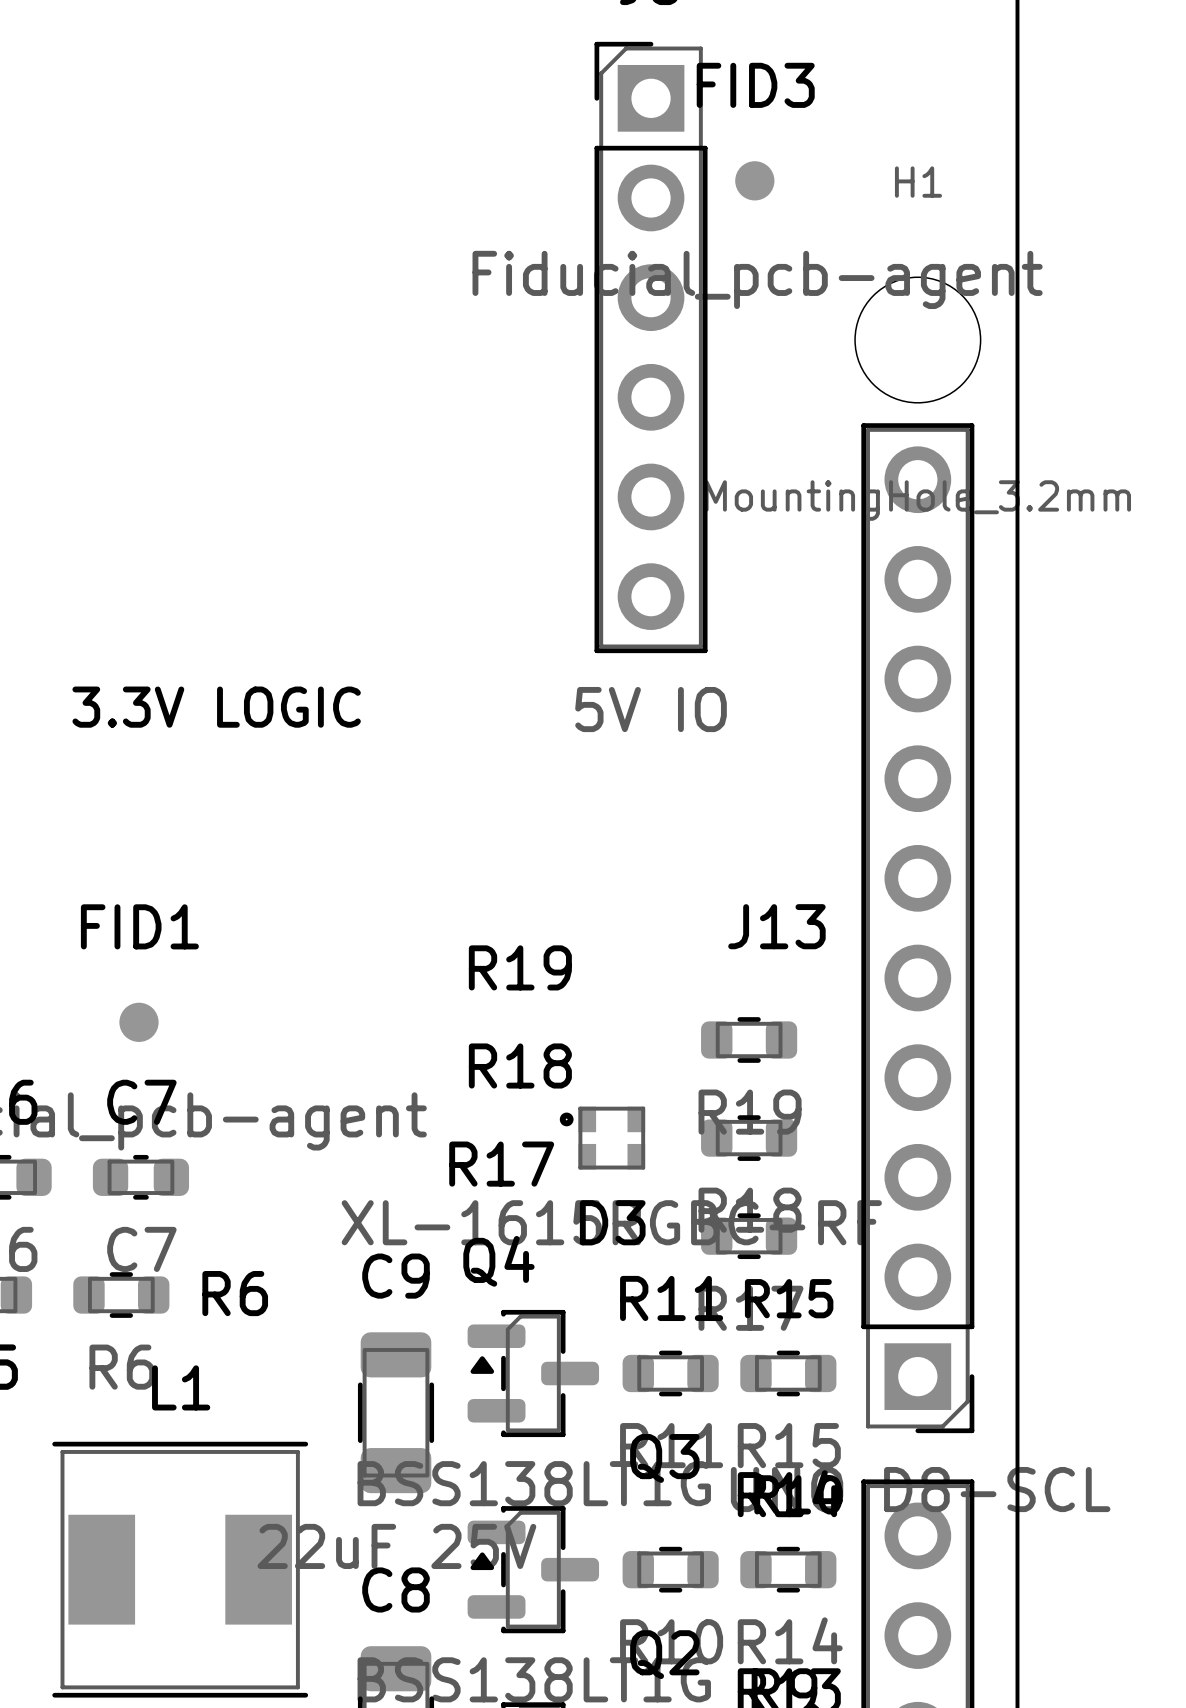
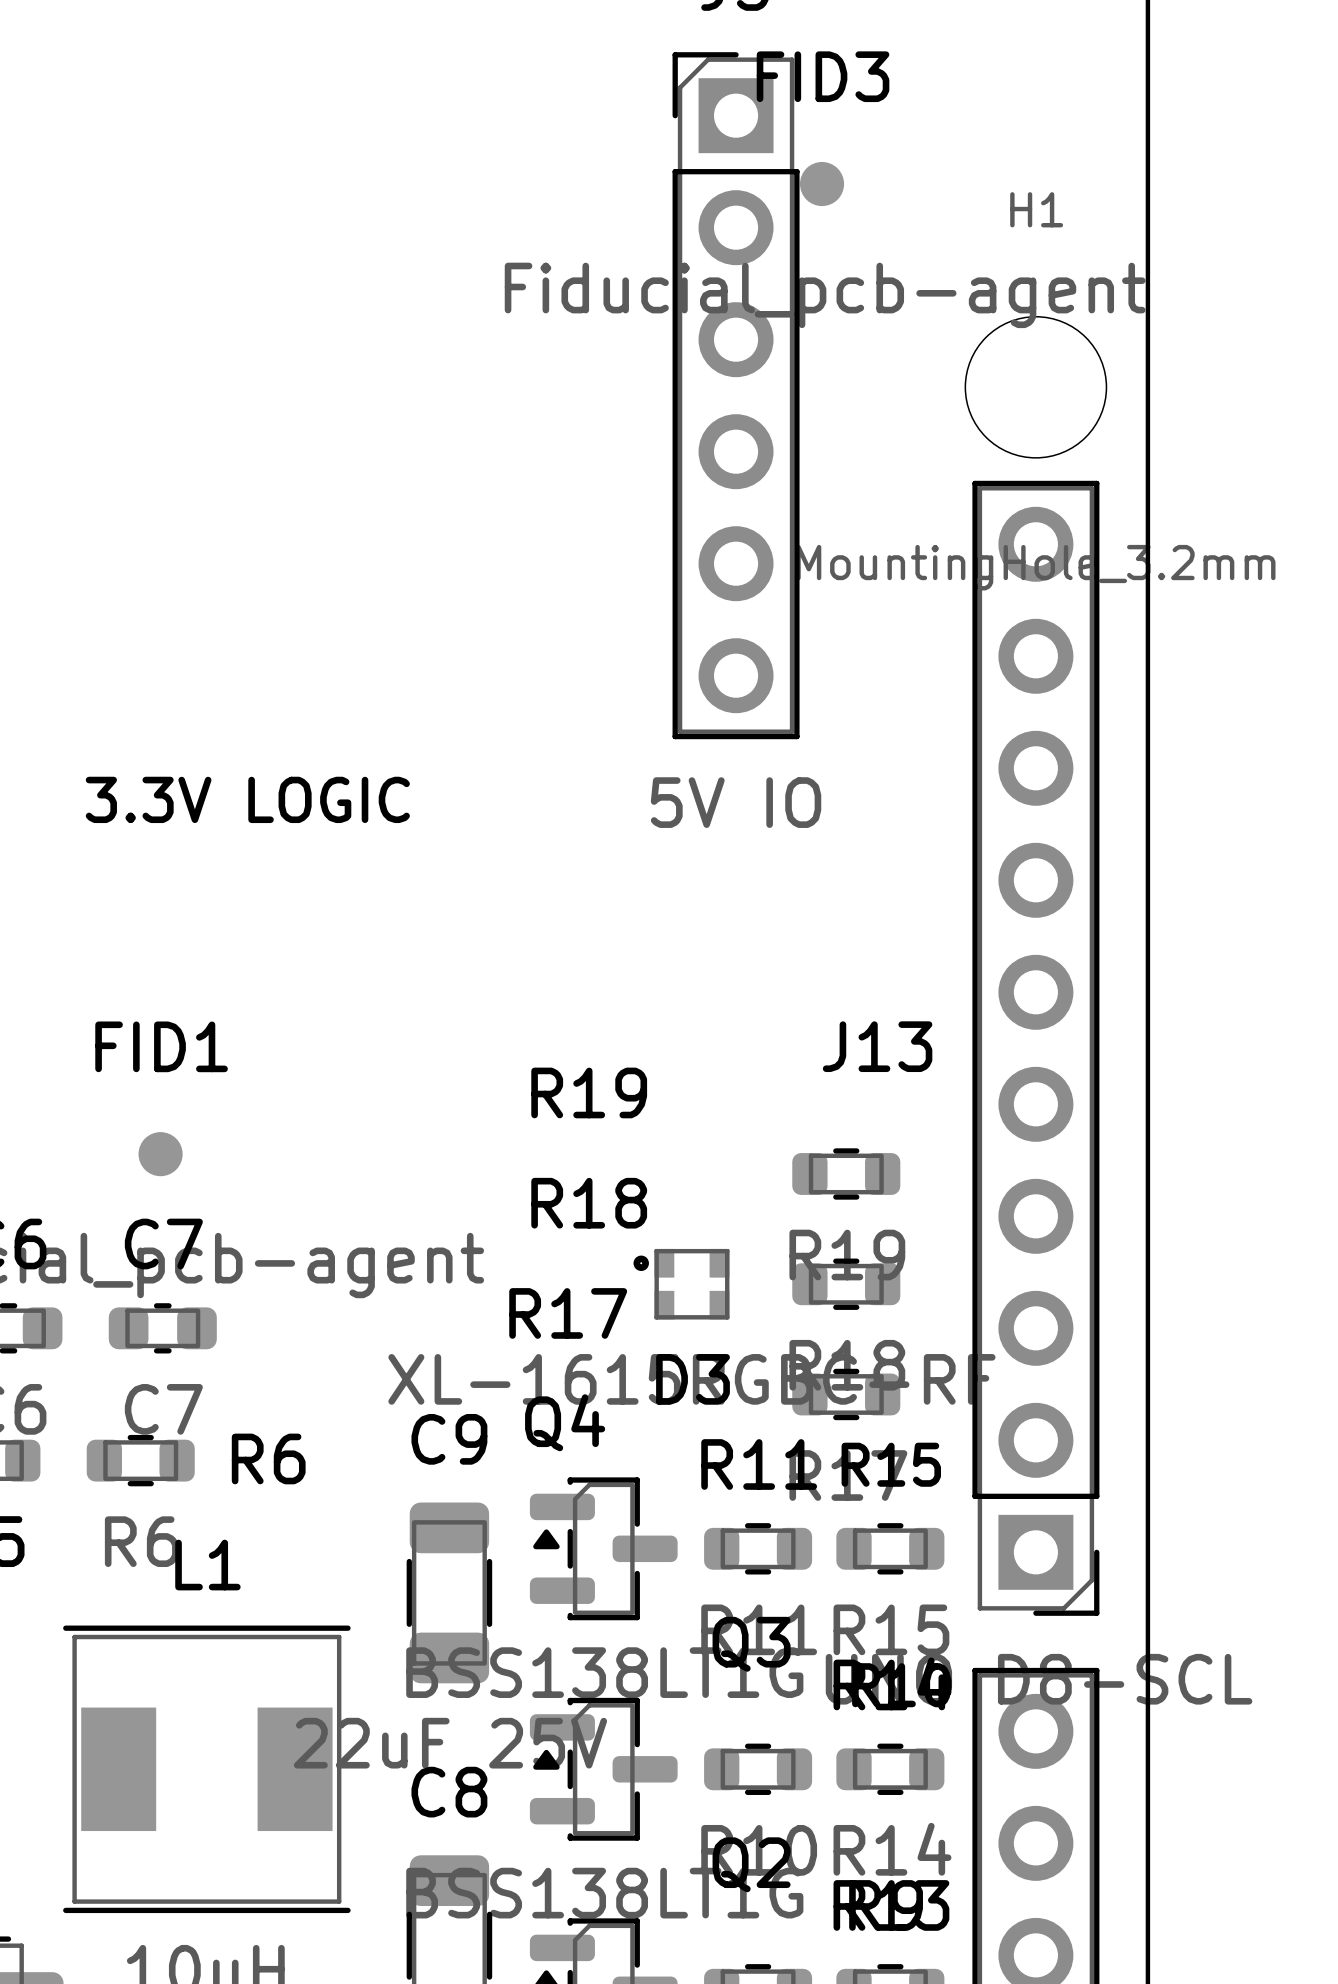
FID3 position: (754, 180) -> (822, 184)

